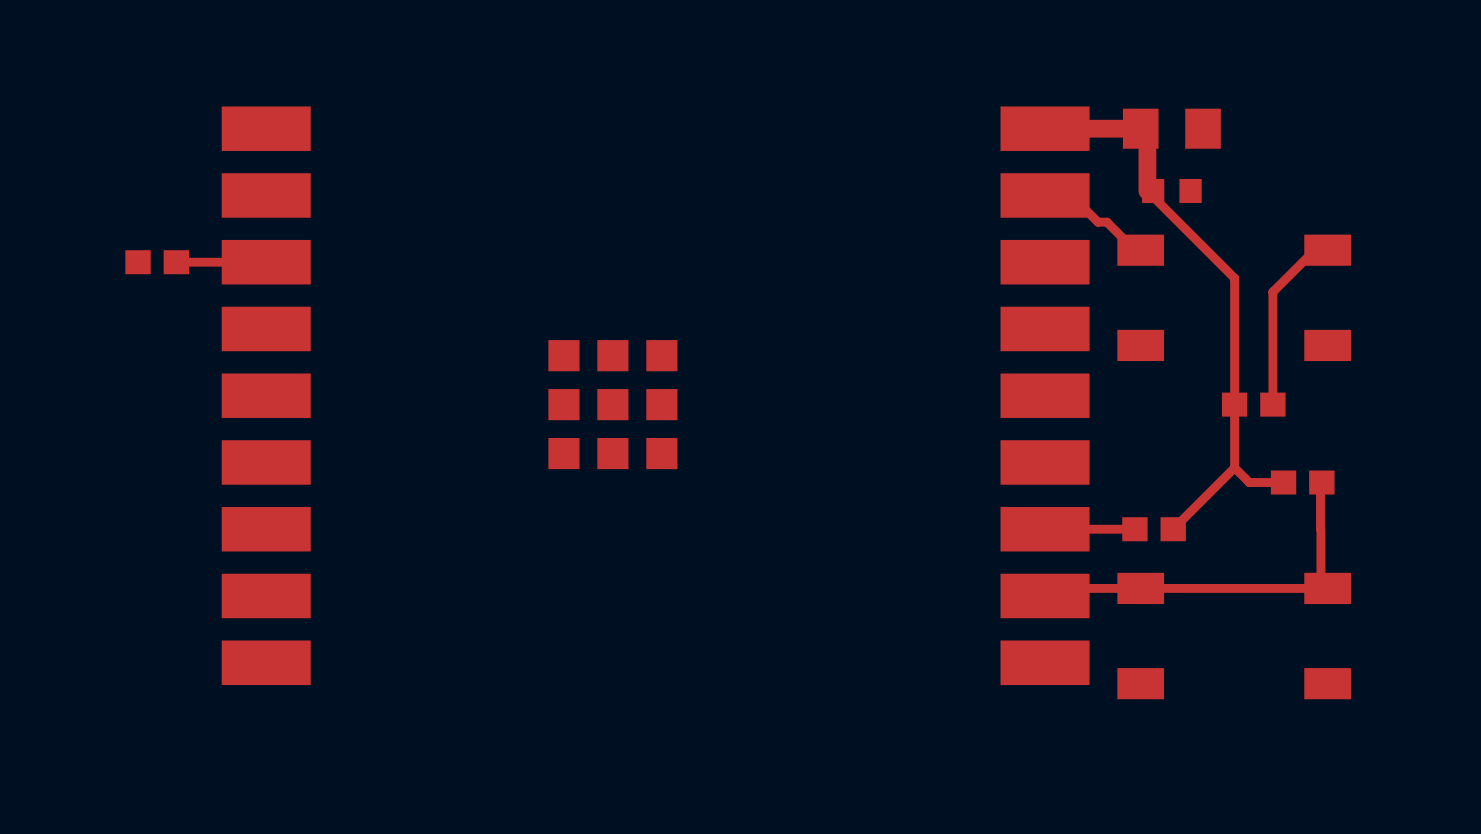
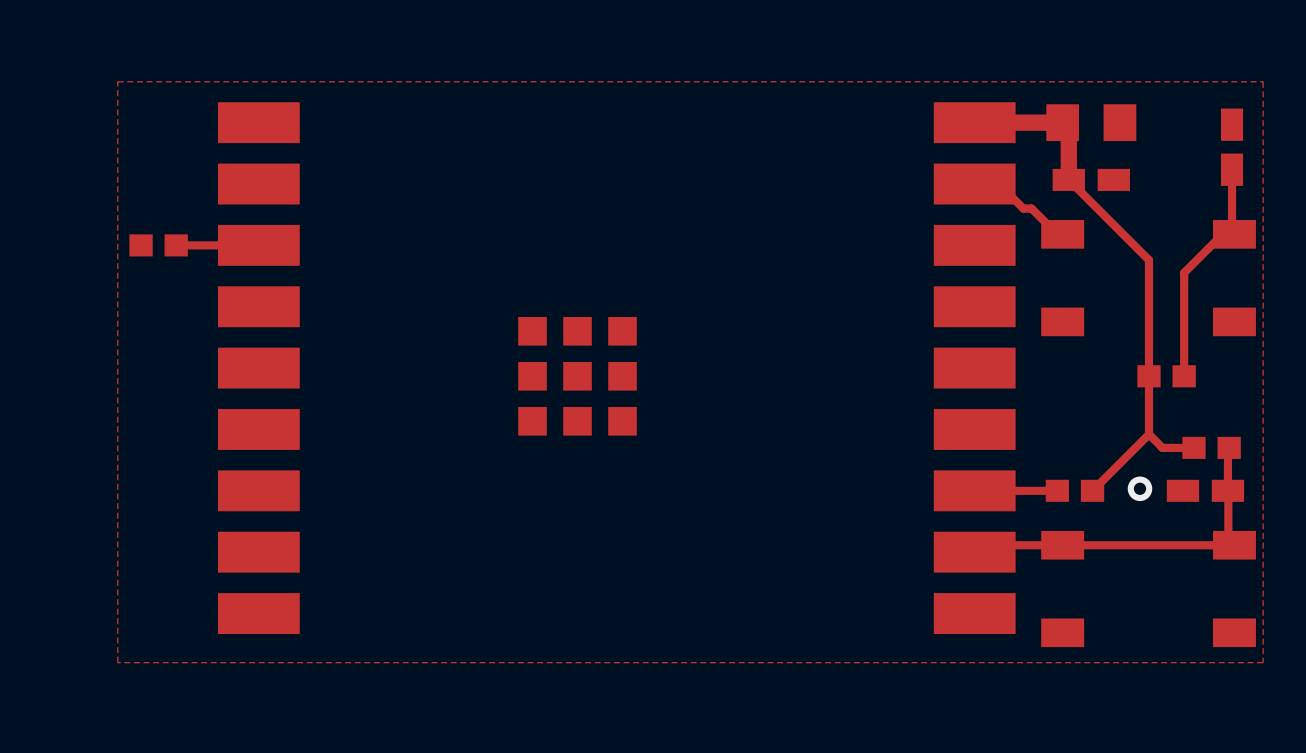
top zone outline: none -> (1263, 81) (1263, 662) (117, 662) (117, 81) (1263, 81)
part: none -> (1232, 147)
part footprint: [1142, 178, 1202, 204] -> [1052, 168, 1130, 191]
top track: none -> (1232, 169) (1232, 231) (1234, 234) (1222, 234)
via: none -> (1139, 488)
part: none -> (1205, 490)

